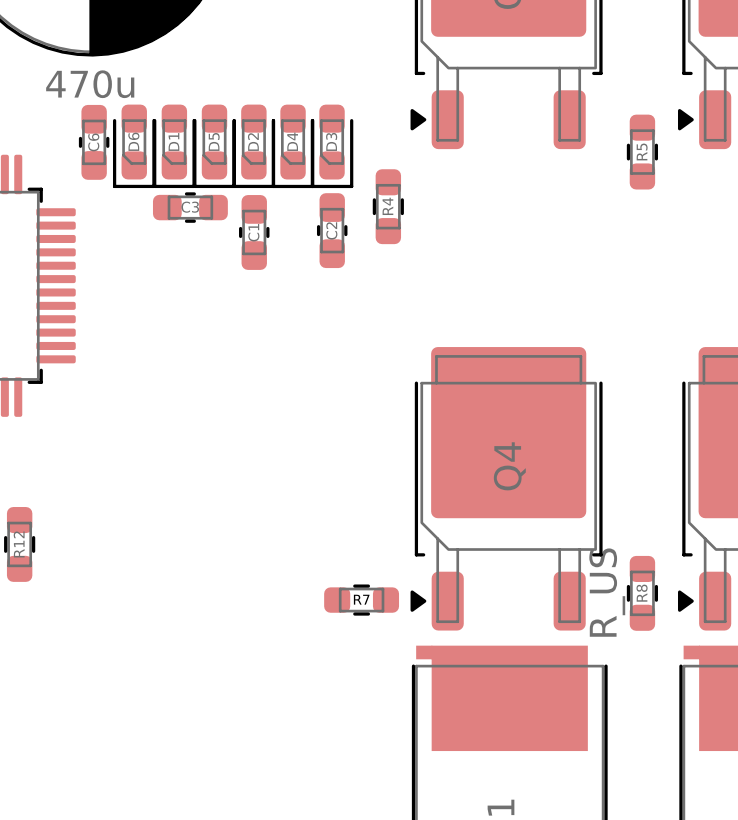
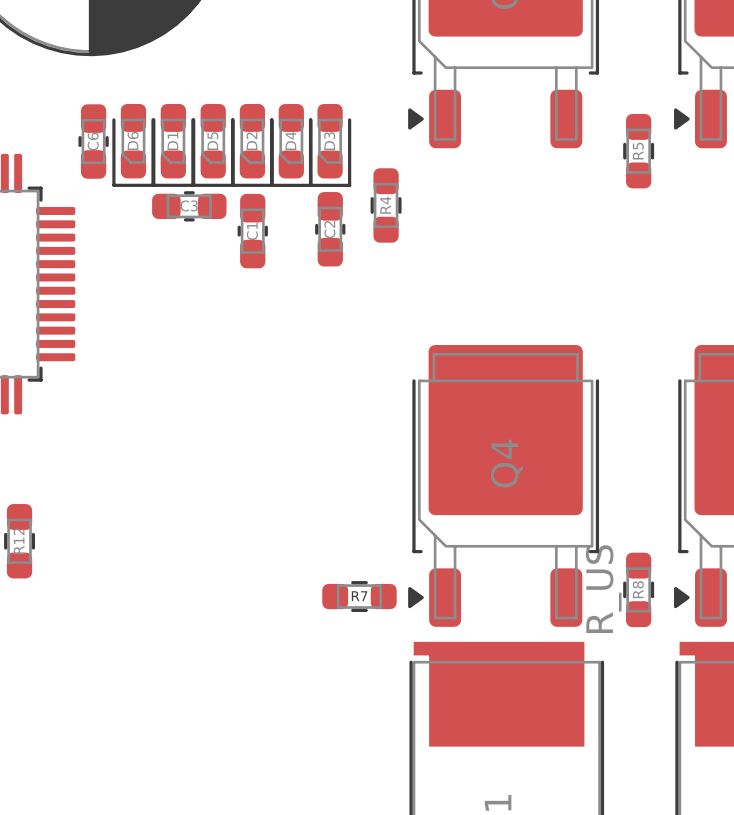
part value: 470u (90, 84) -> none

